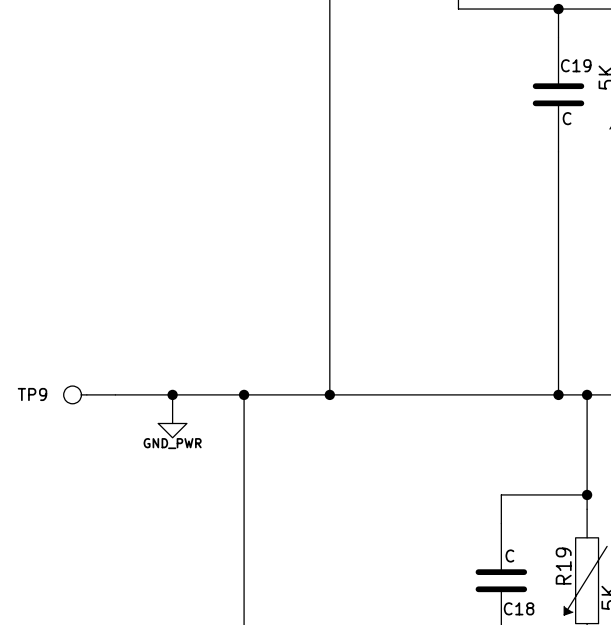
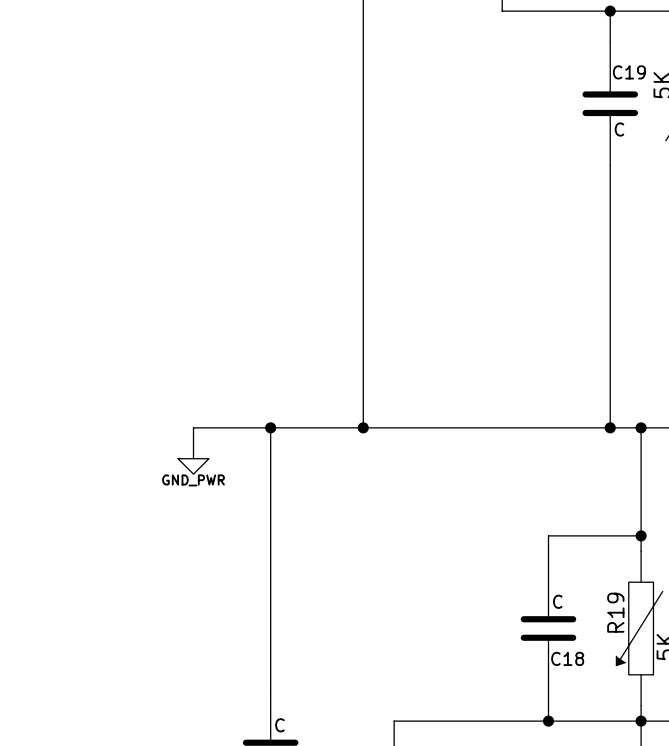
TP9: (89, 394) -> none
wire: (115, 394) (172, 394) -> none
junction: (172, 394) -> none

